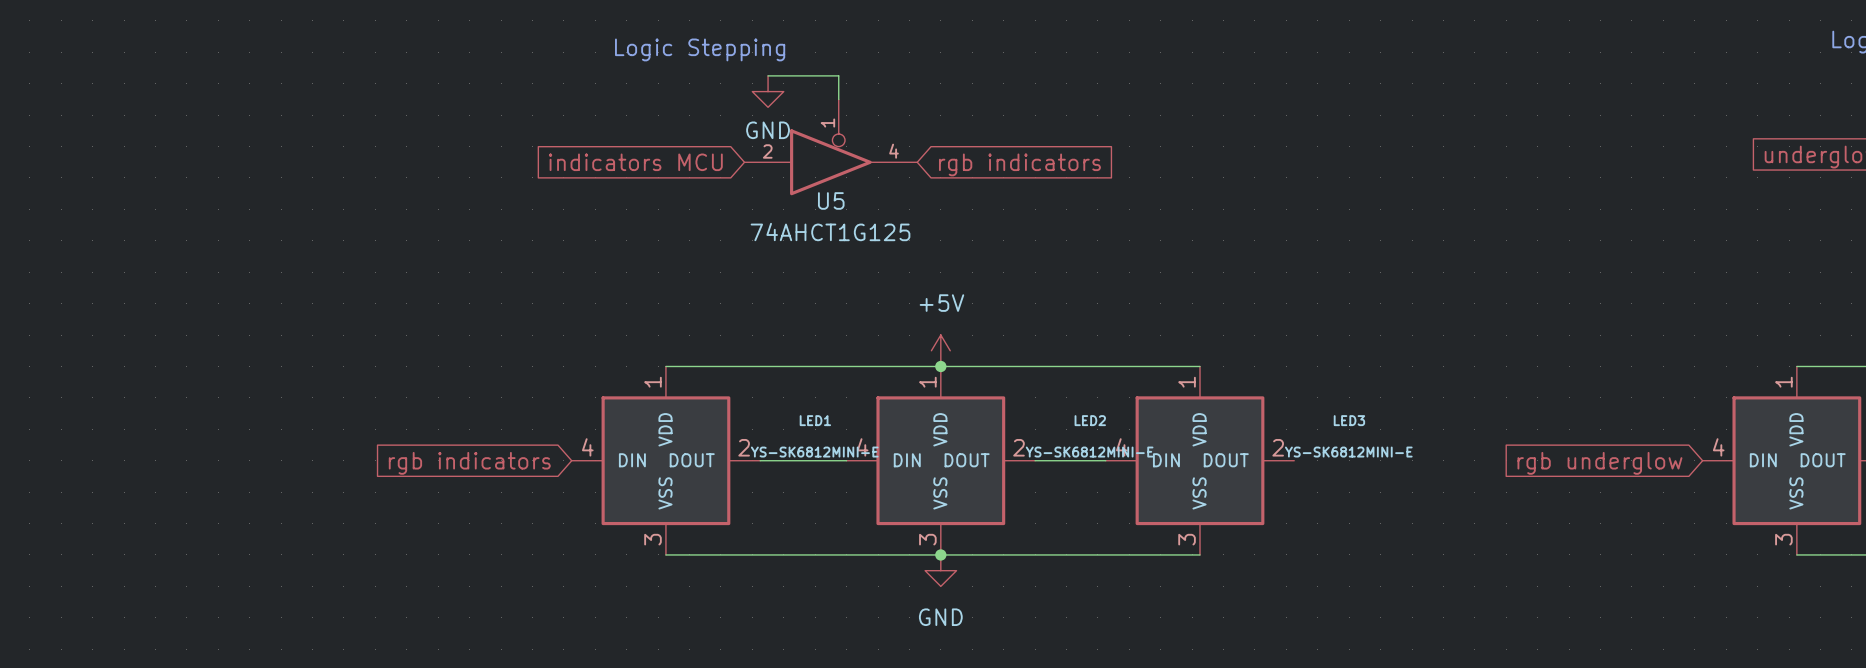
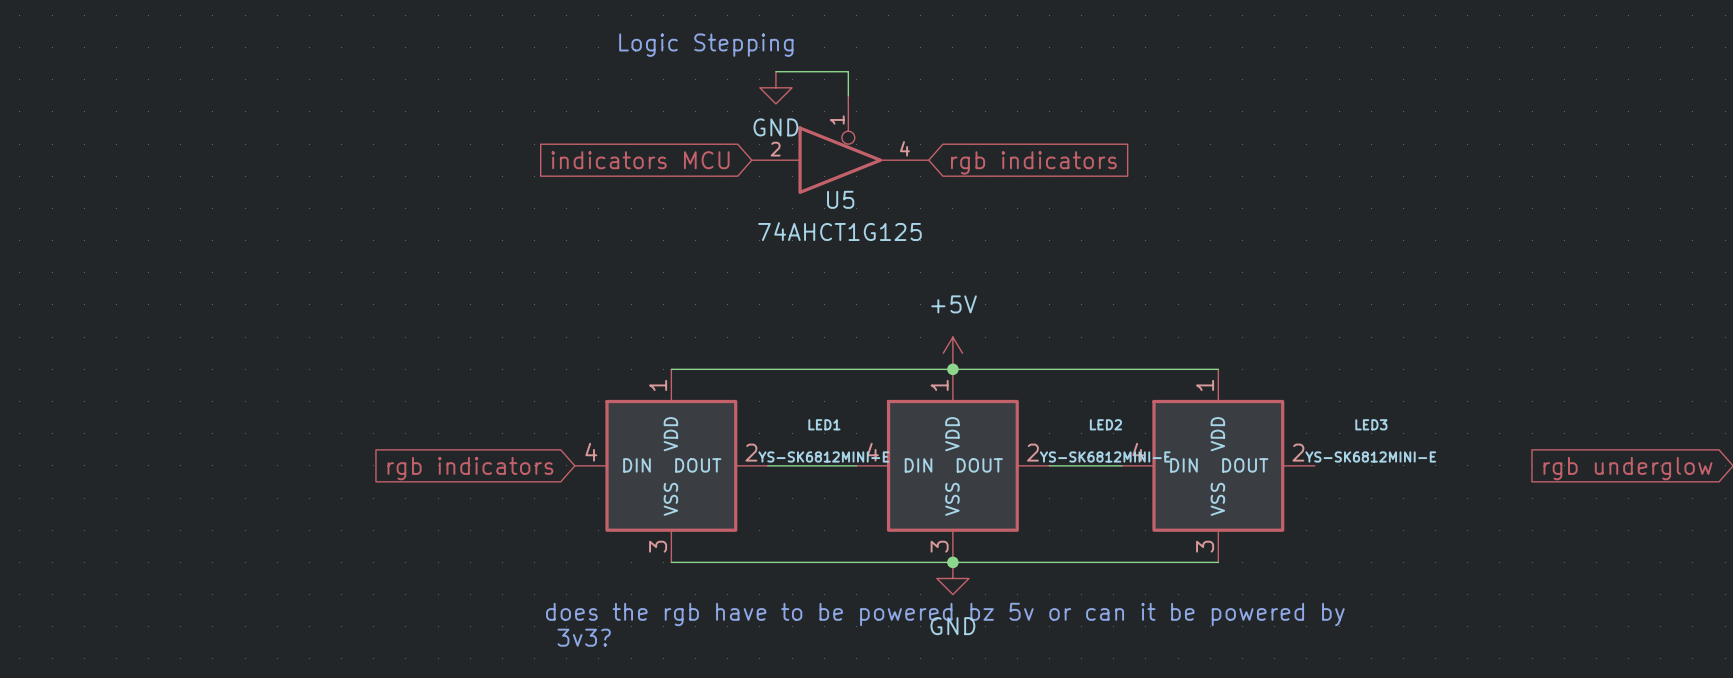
text: none -> does the rgb have to be powered bz 5v or can it be powered by (945, 614)
text: none -> 3v3? (584, 637)

